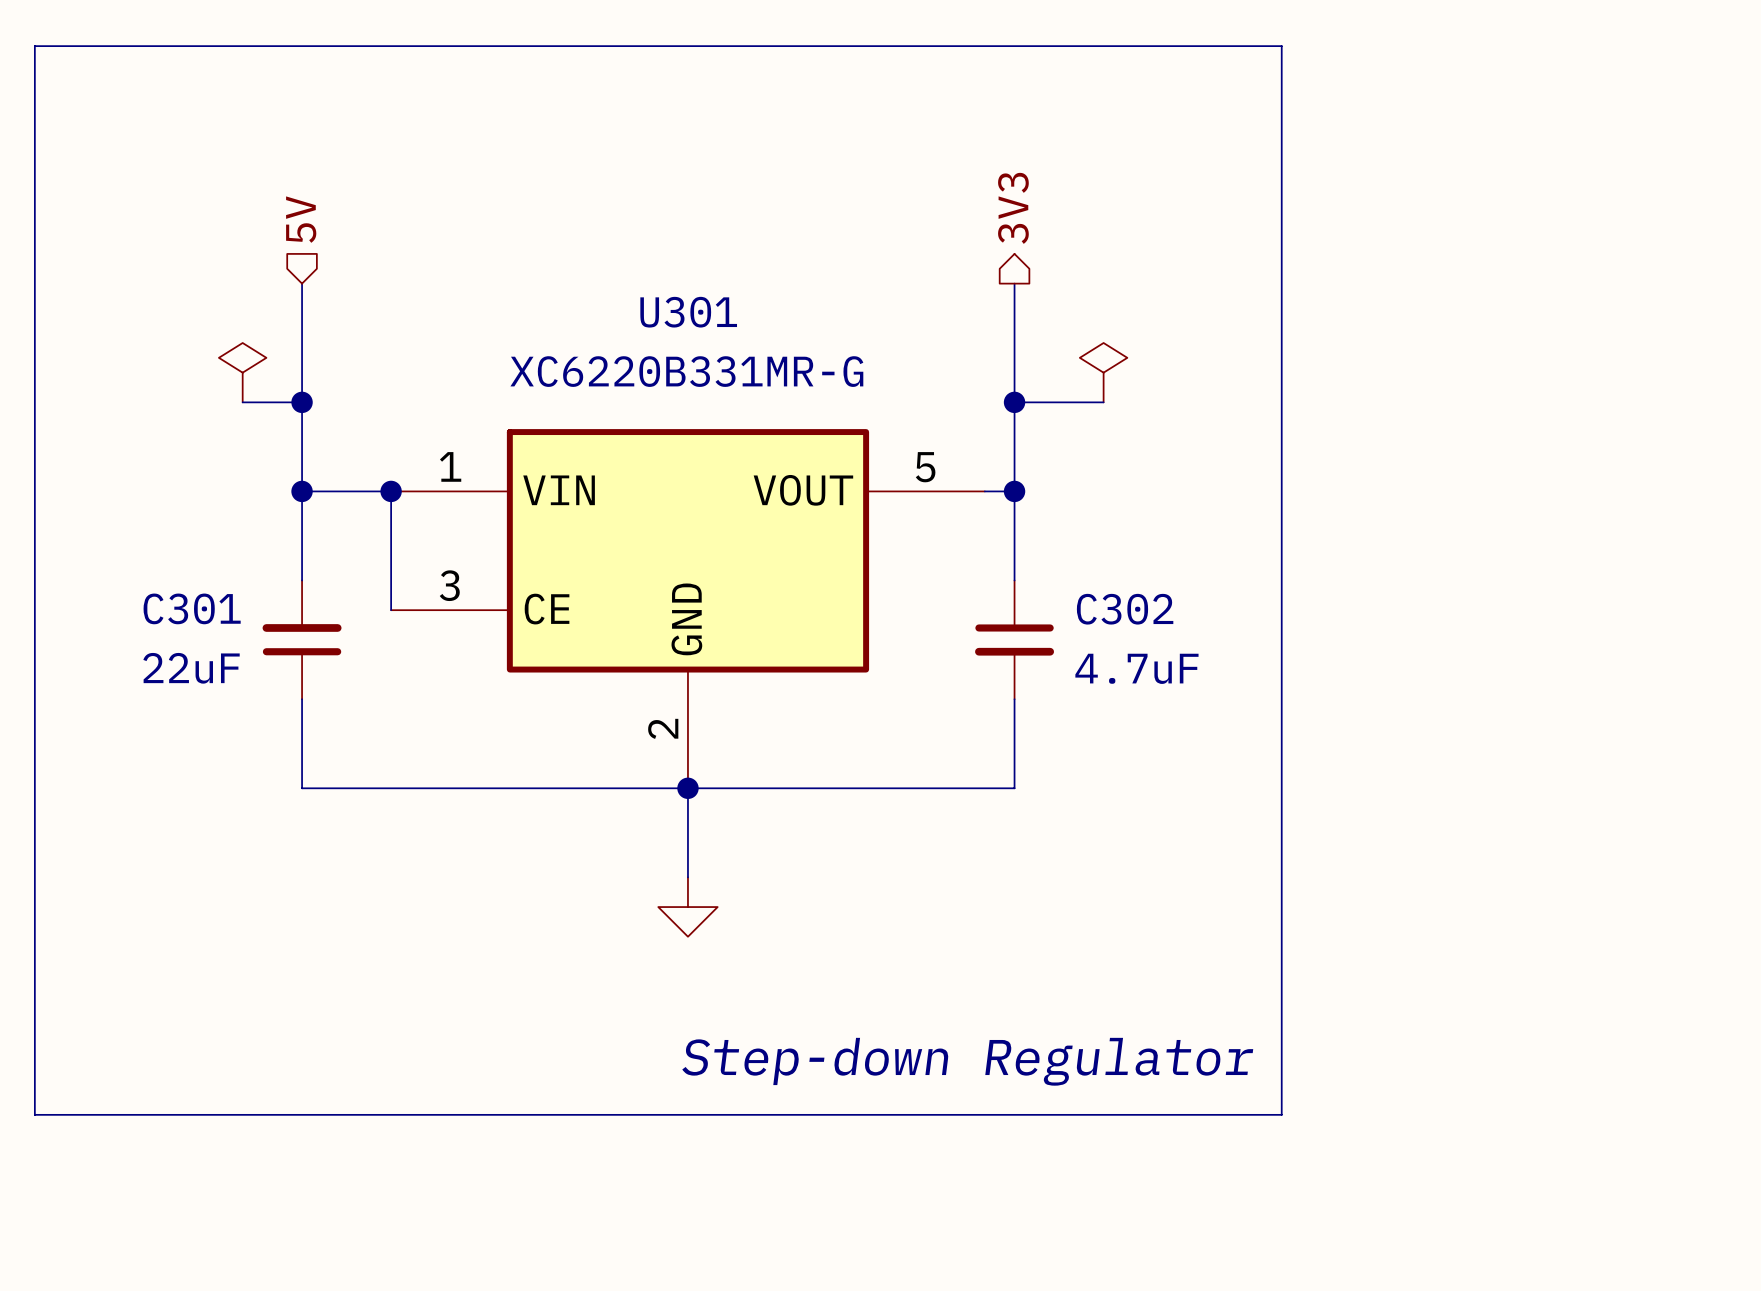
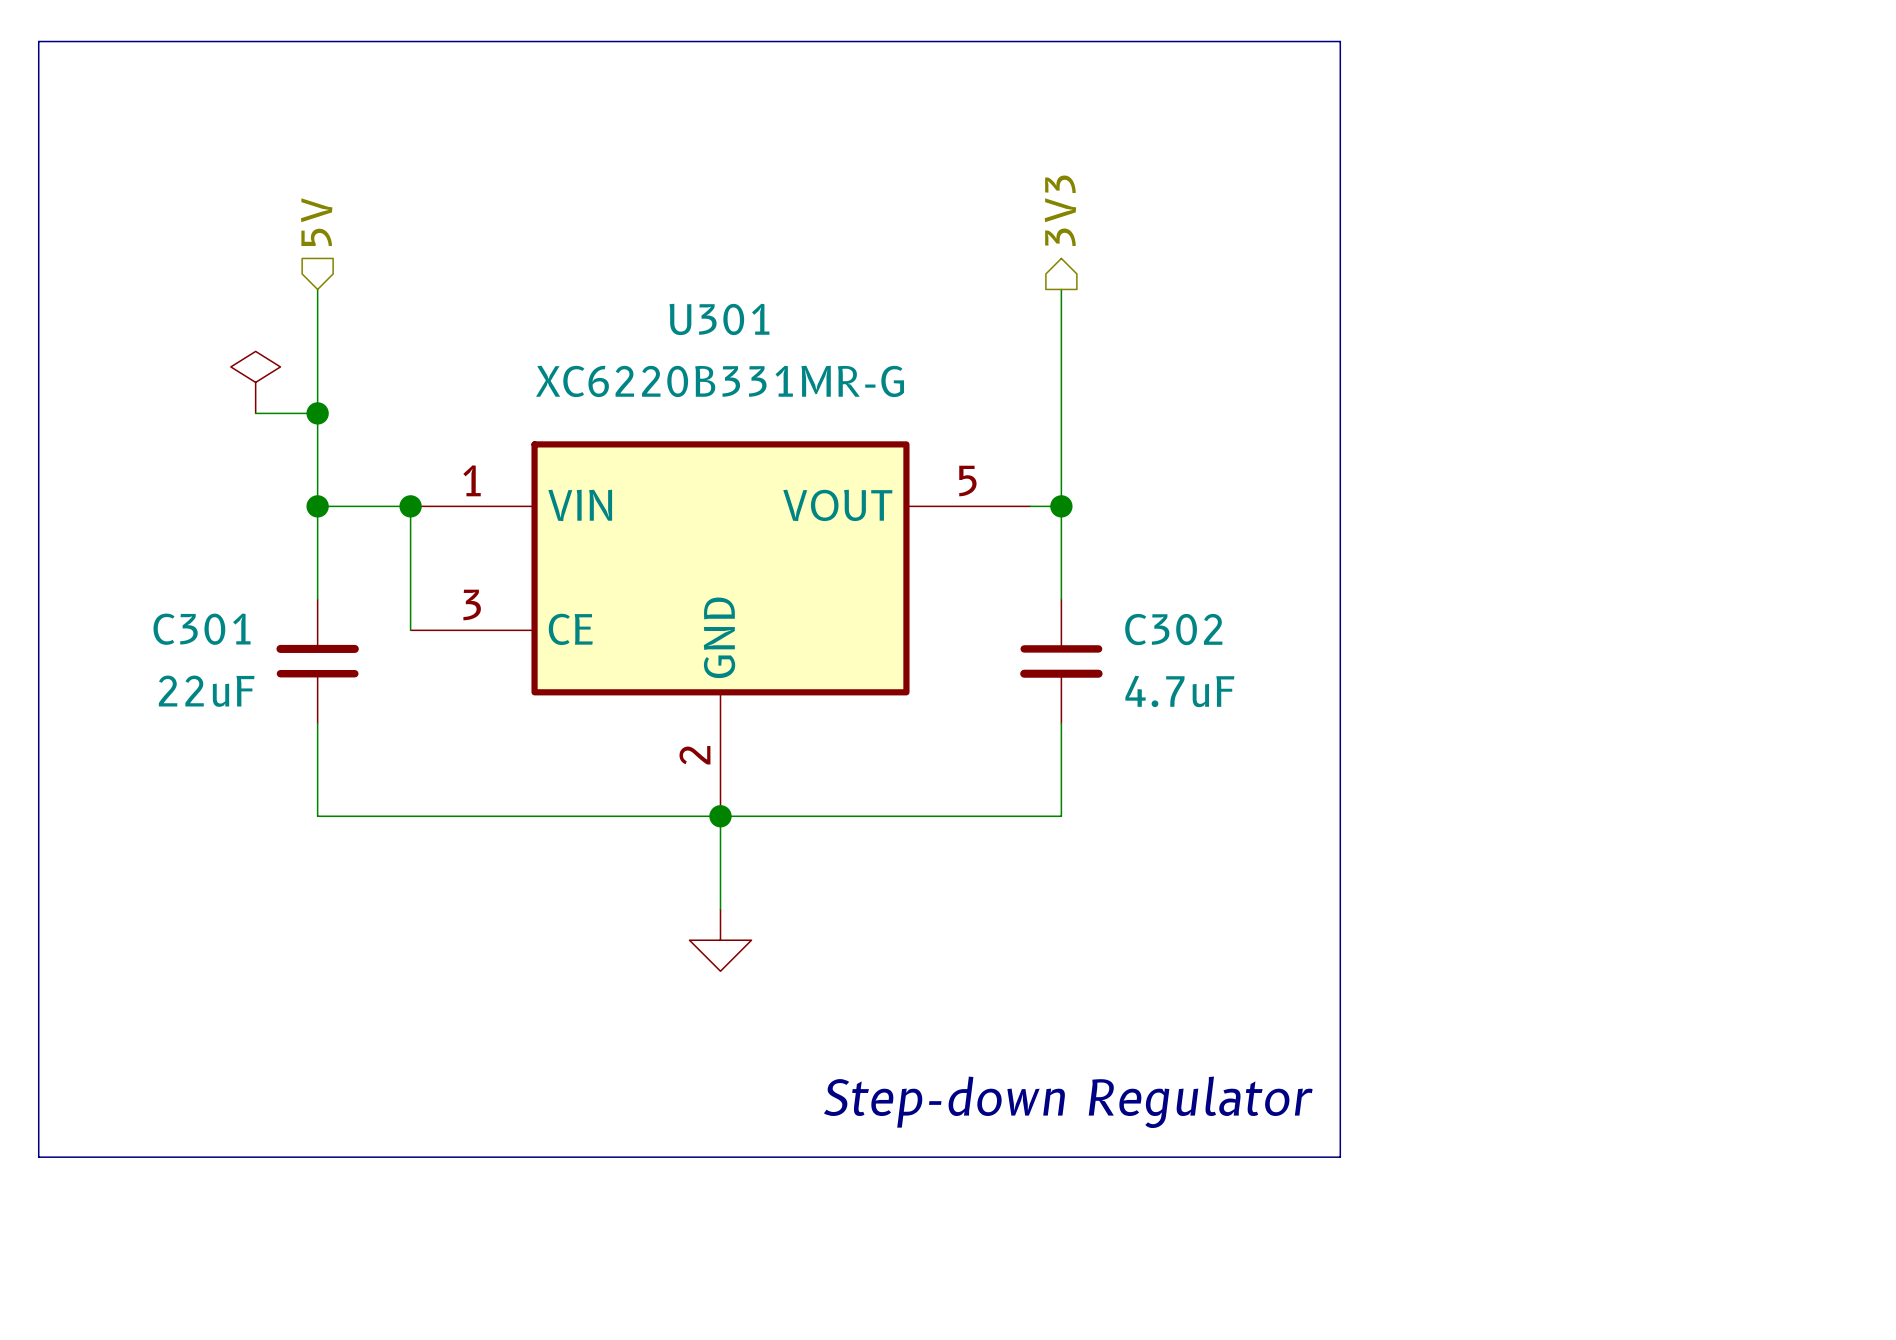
power symbol: (1103, 372) -> none
wire: (1014, 402) (1103, 402) -> none
junction: (1014, 402) -> none

